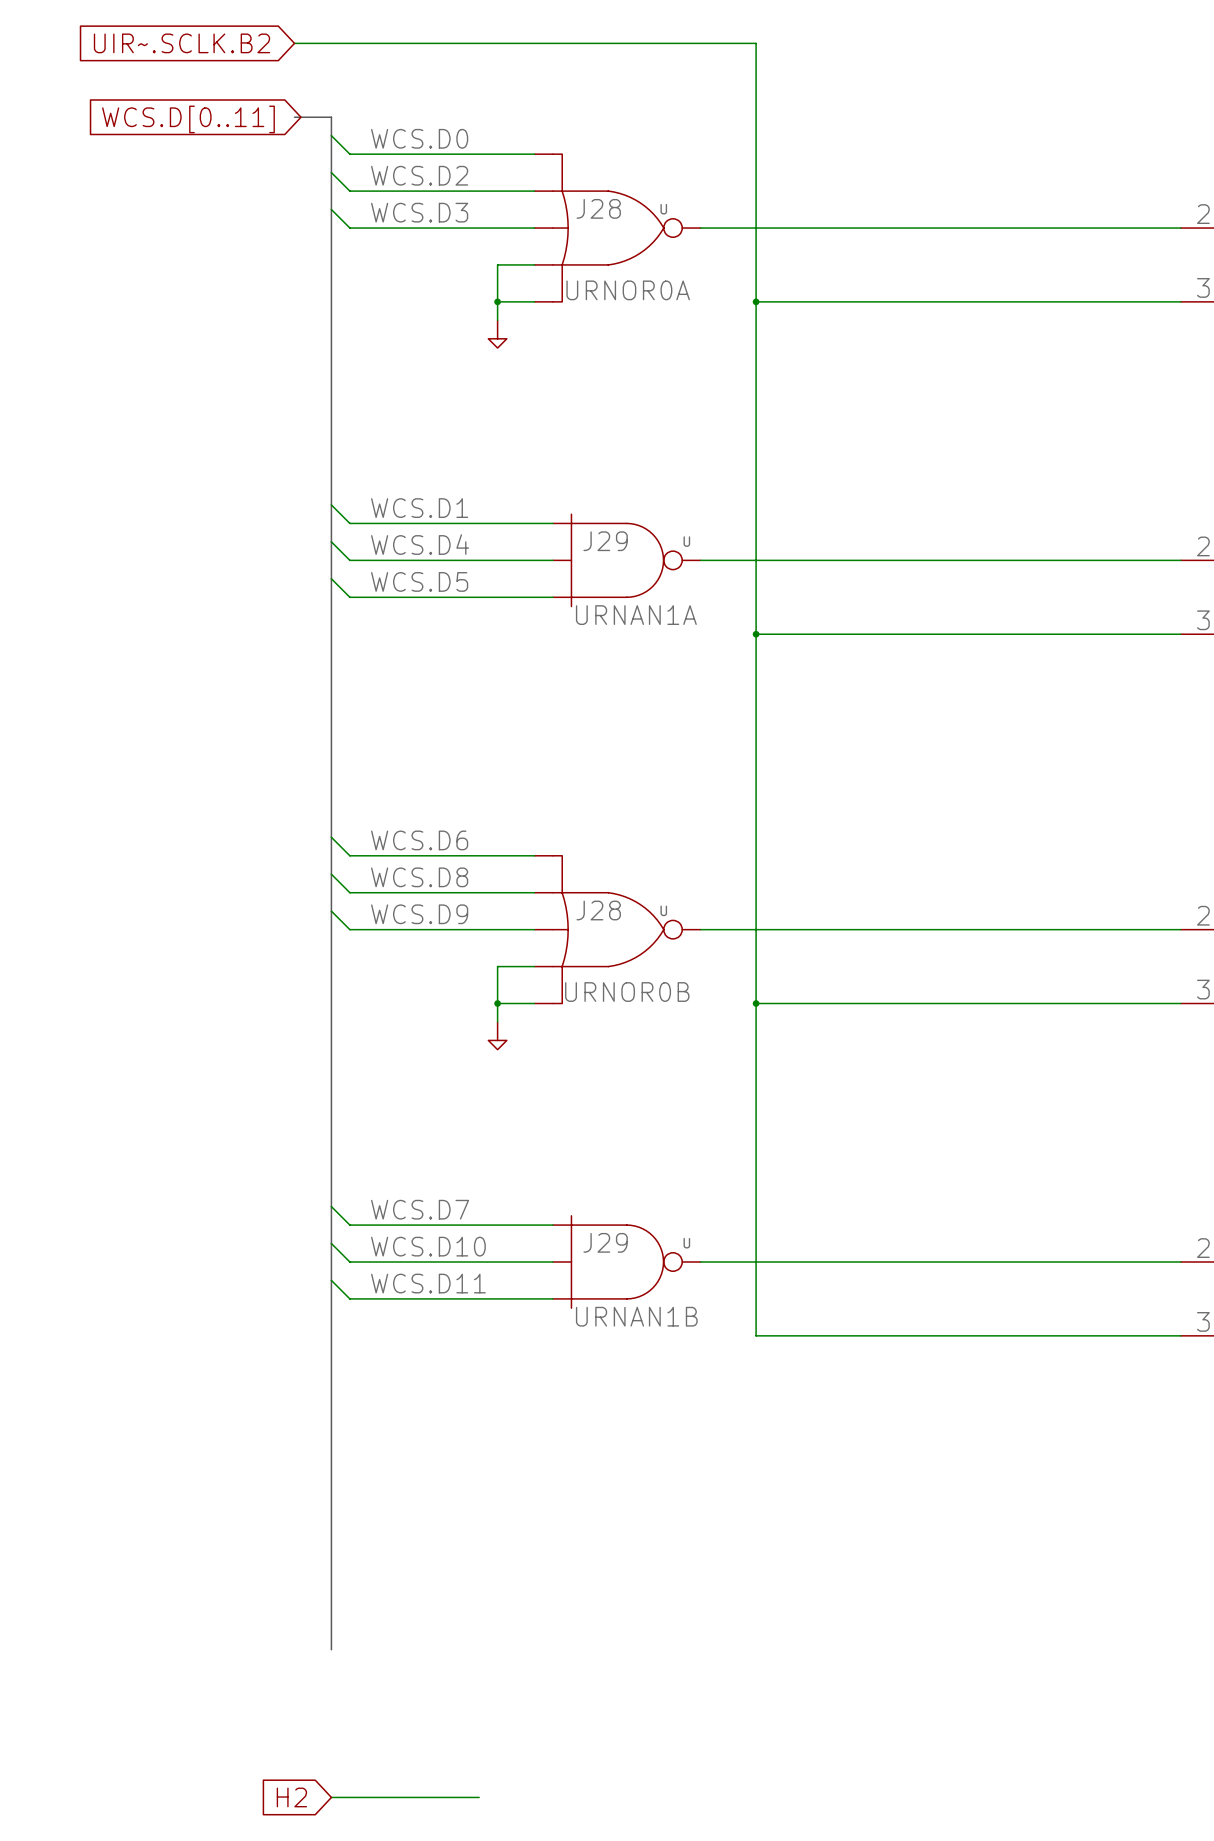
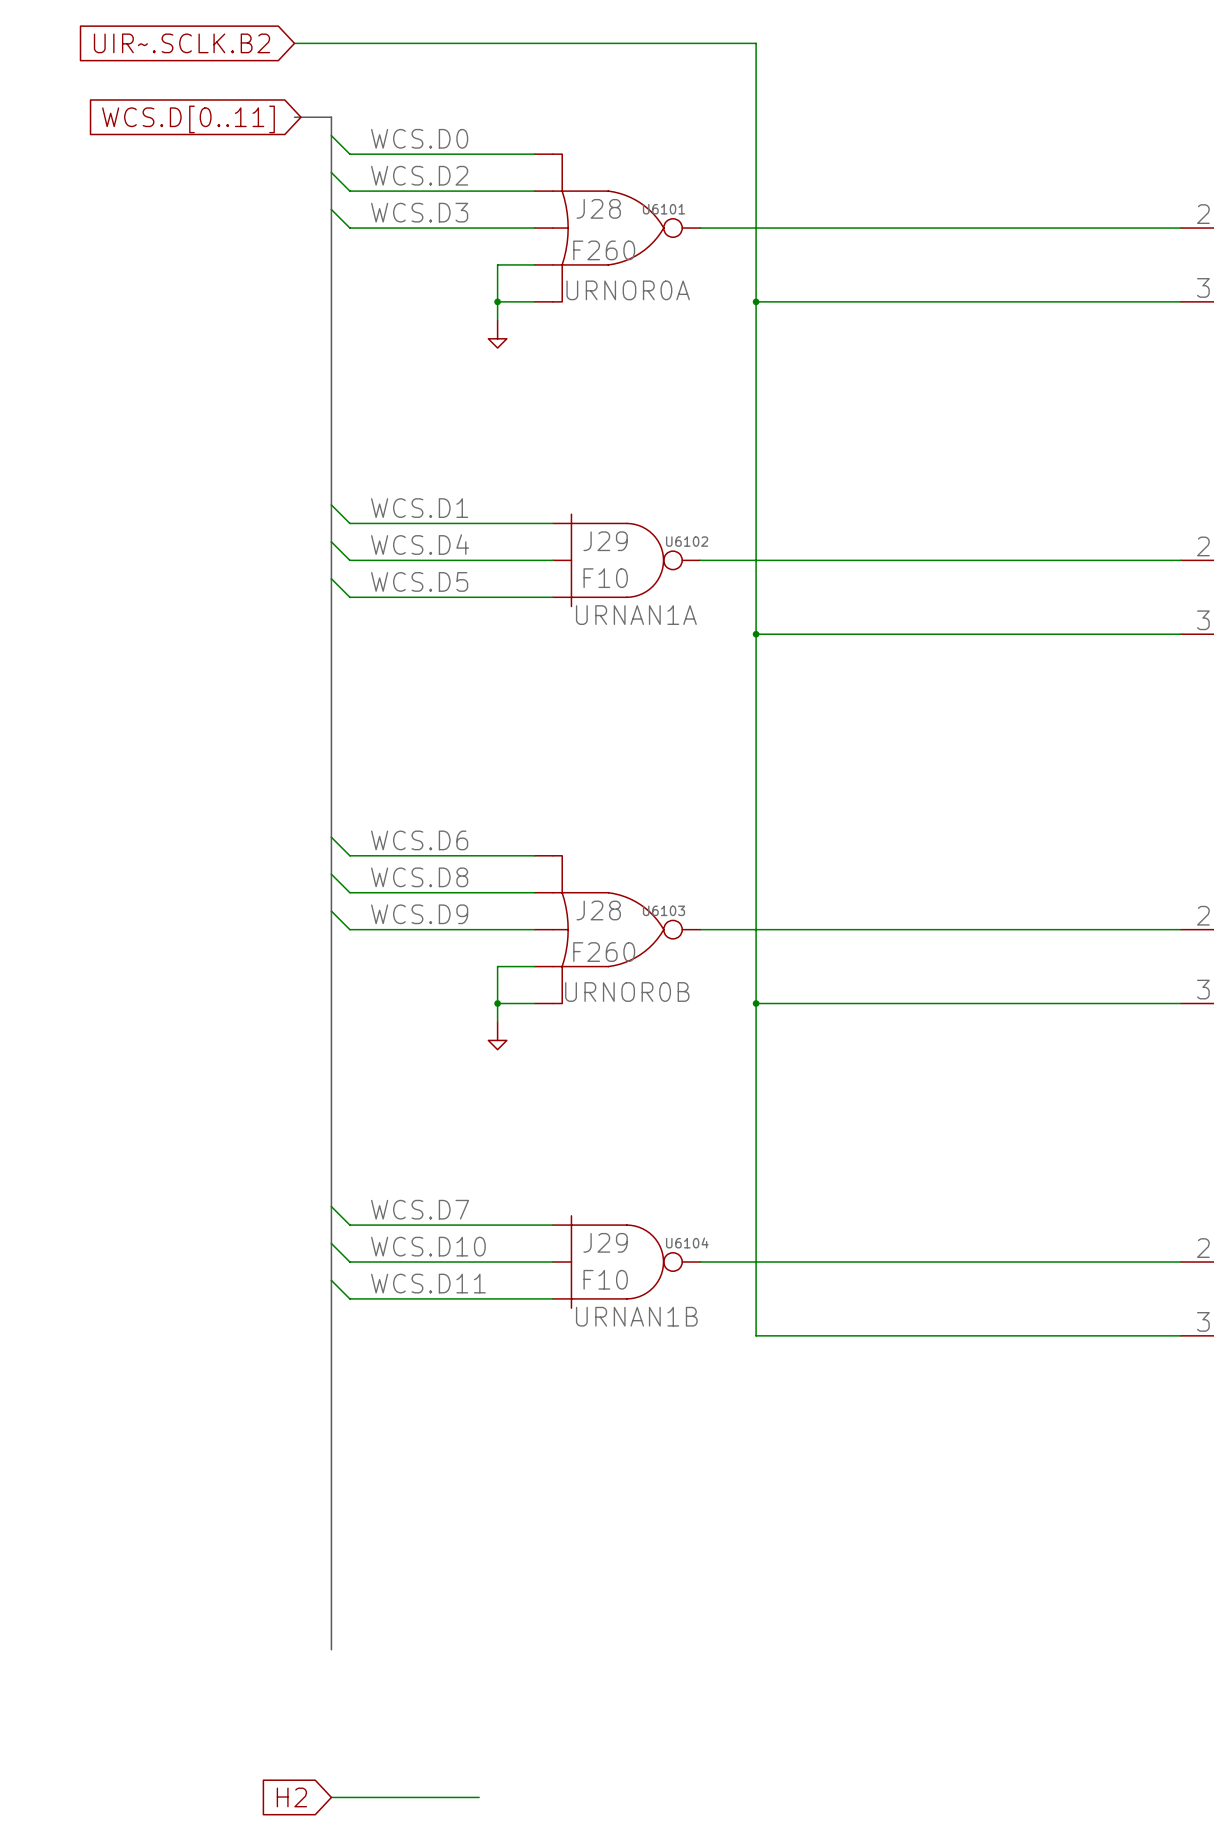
U name: U (663, 209) -> U6101 (663, 209)
U value: none -> F260 (604, 250)
U name: U (686, 541) -> U6102 (687, 541)
U value: none -> F10 (605, 578)
U name: U (663, 910) -> U6103 (663, 910)
U value: none -> F260 (604, 952)
U name: U (686, 1243) -> U6104 (687, 1242)
U value: none -> F10 (605, 1279)

